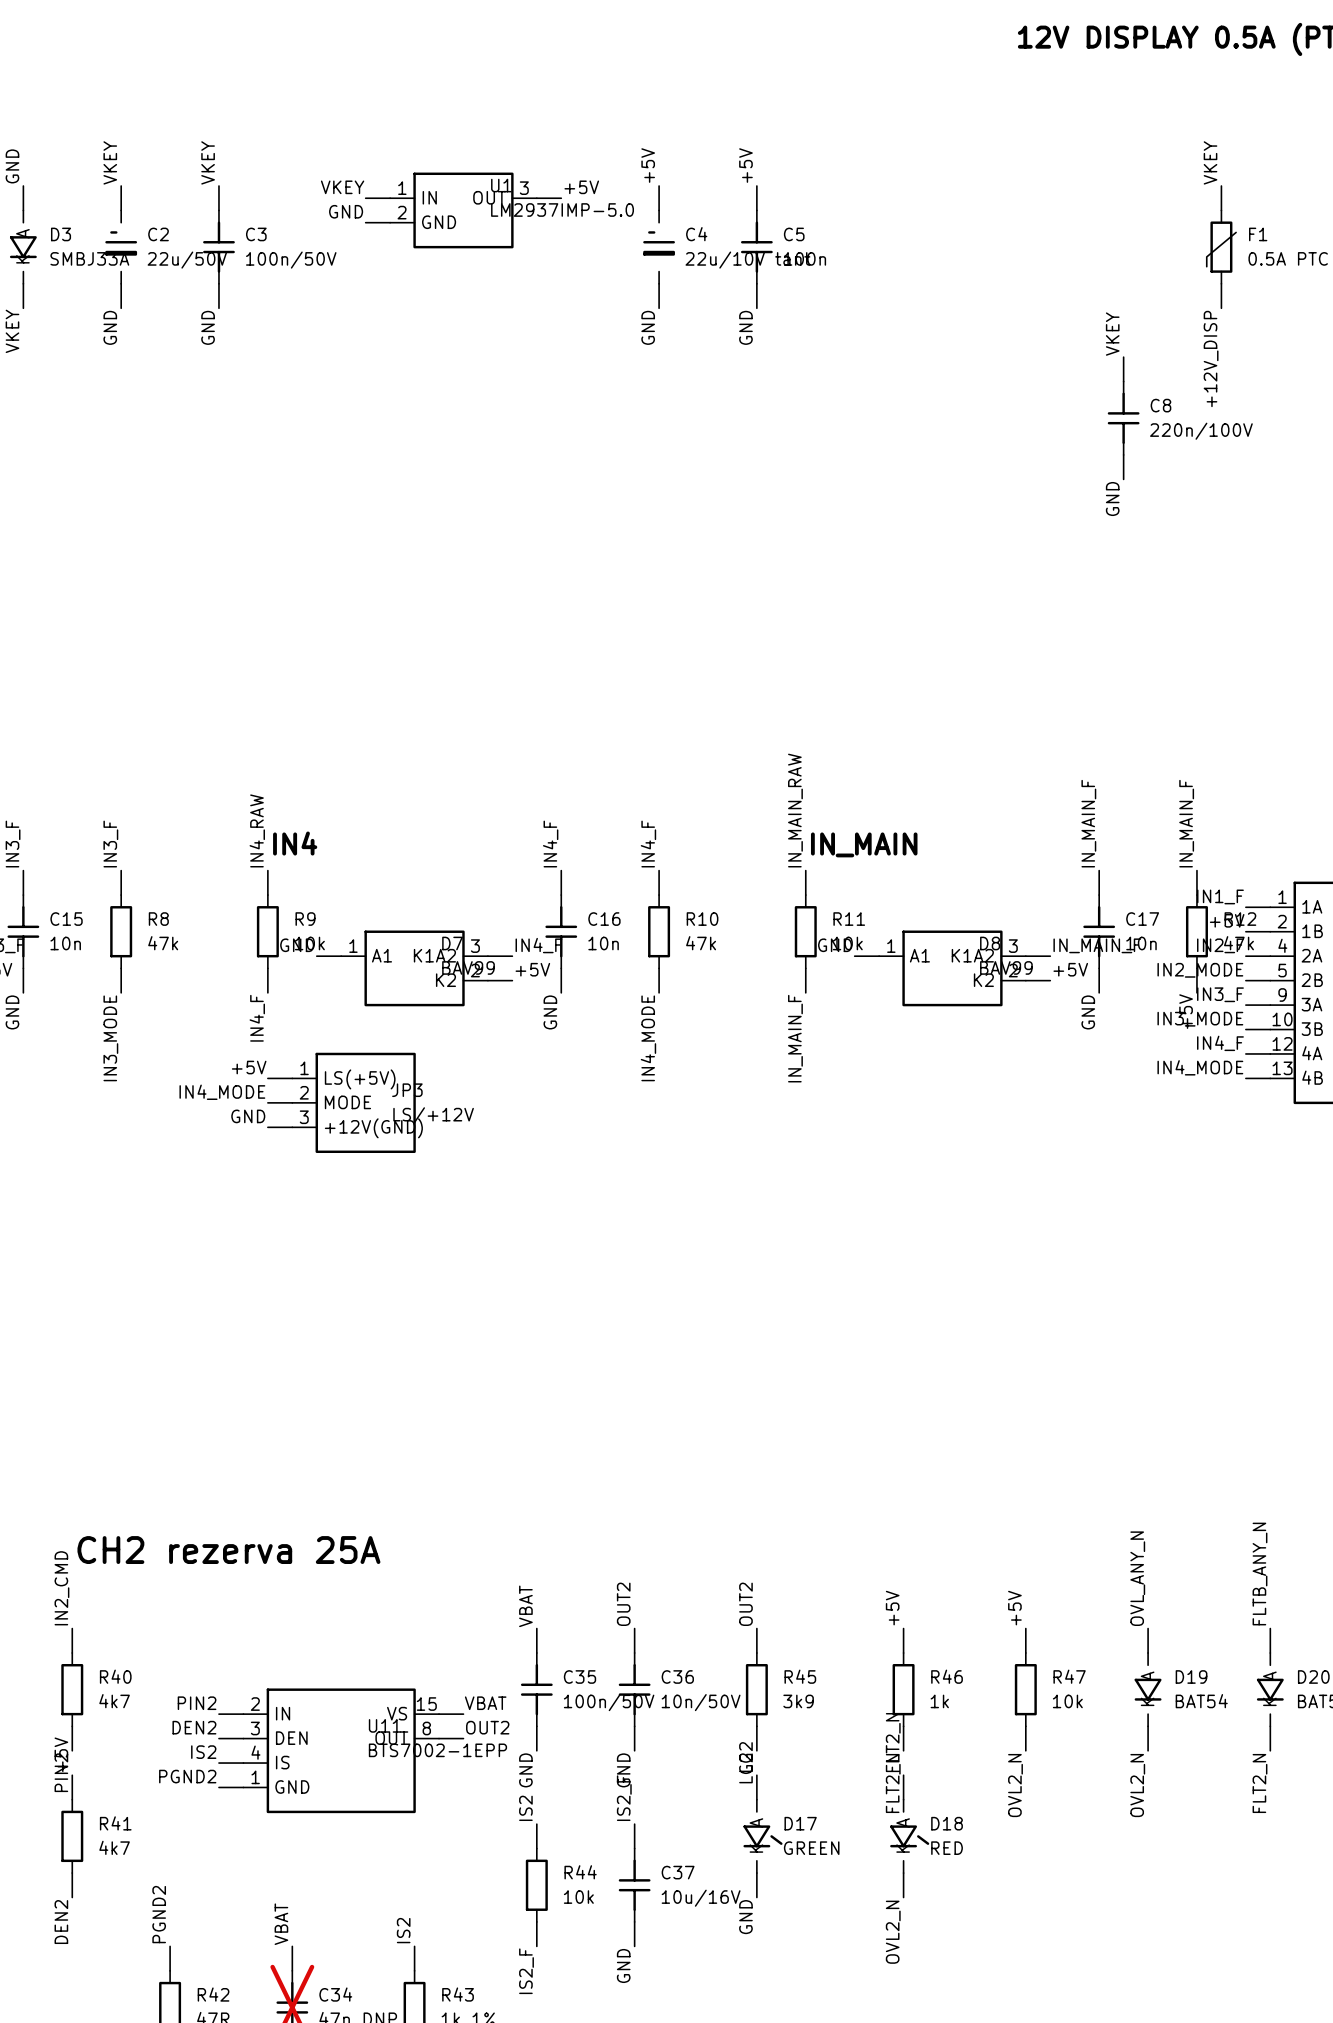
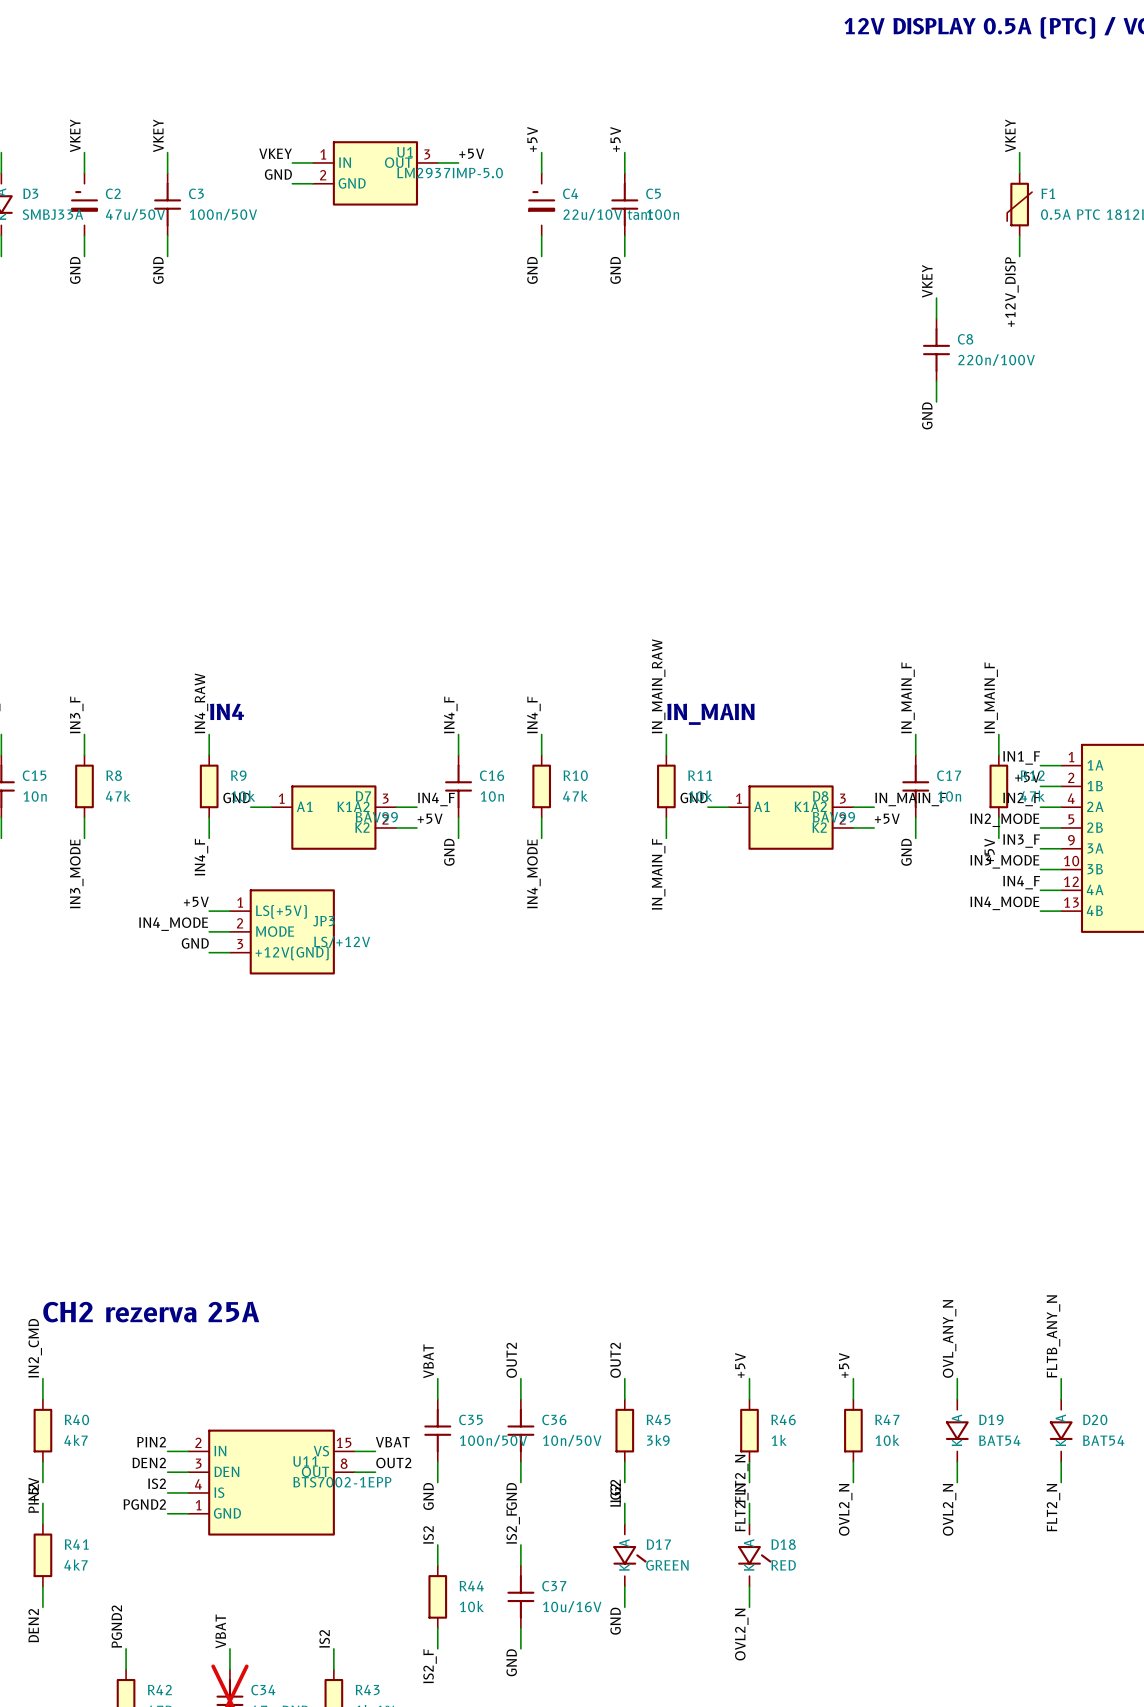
C2 value: 22u/50V (187, 260) -> 47u/50V (135, 214)

